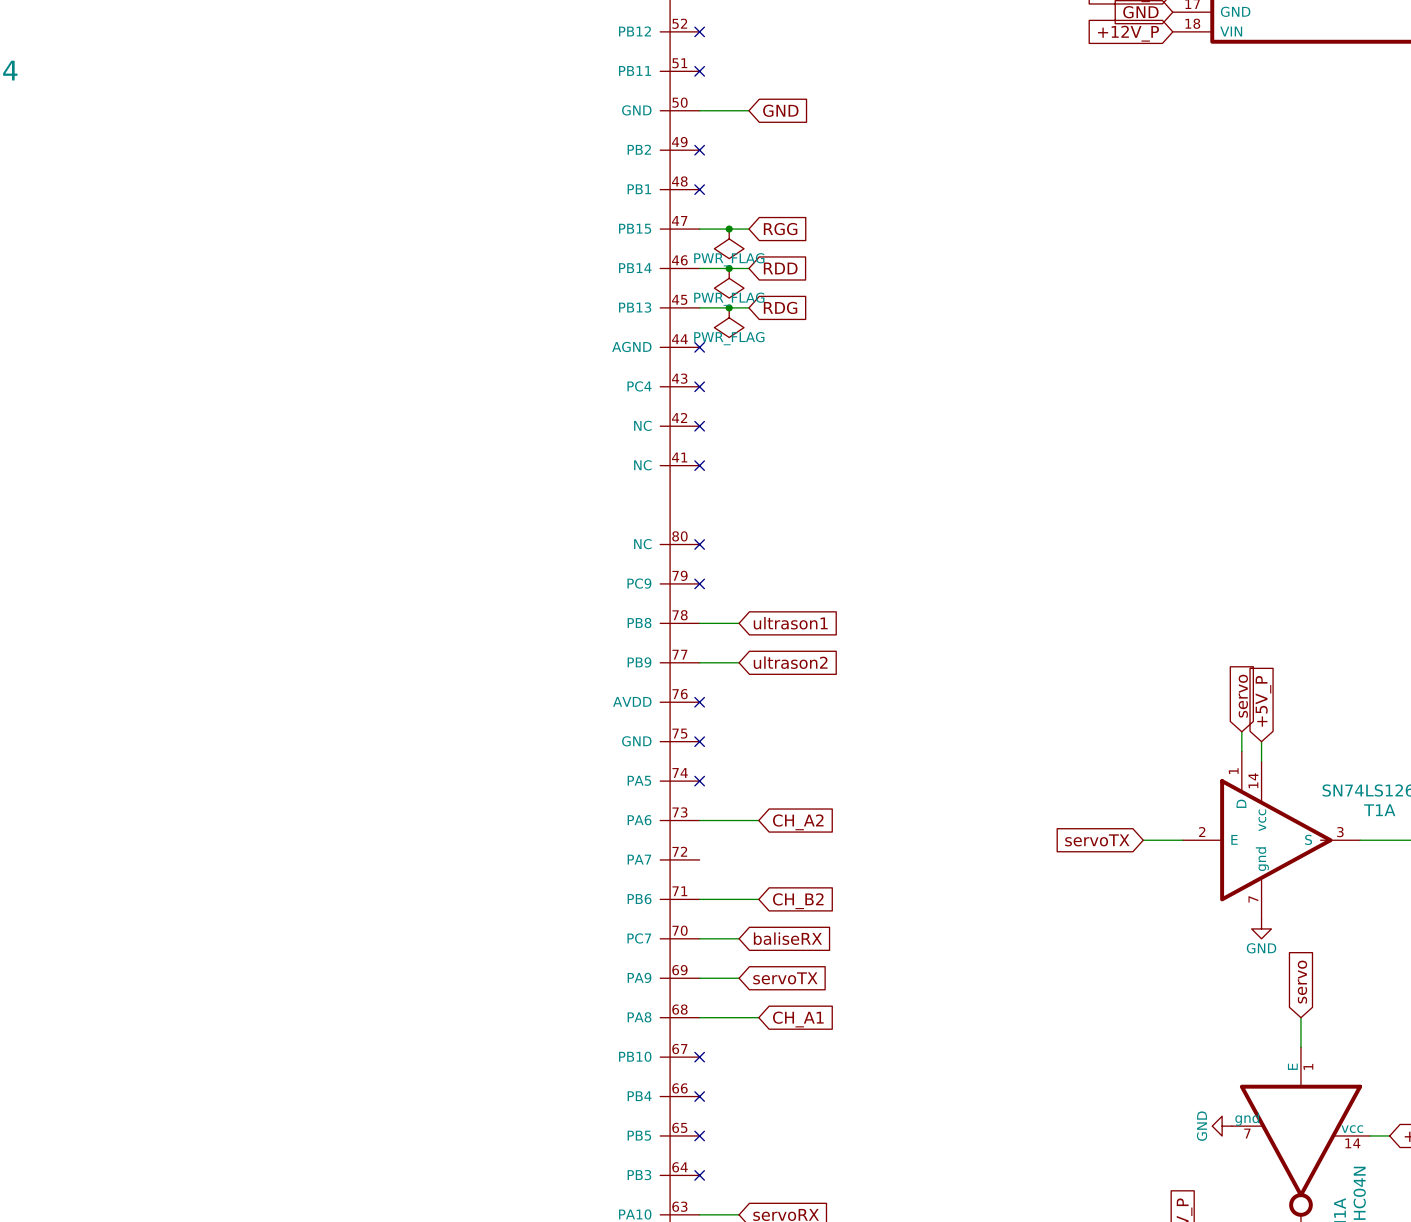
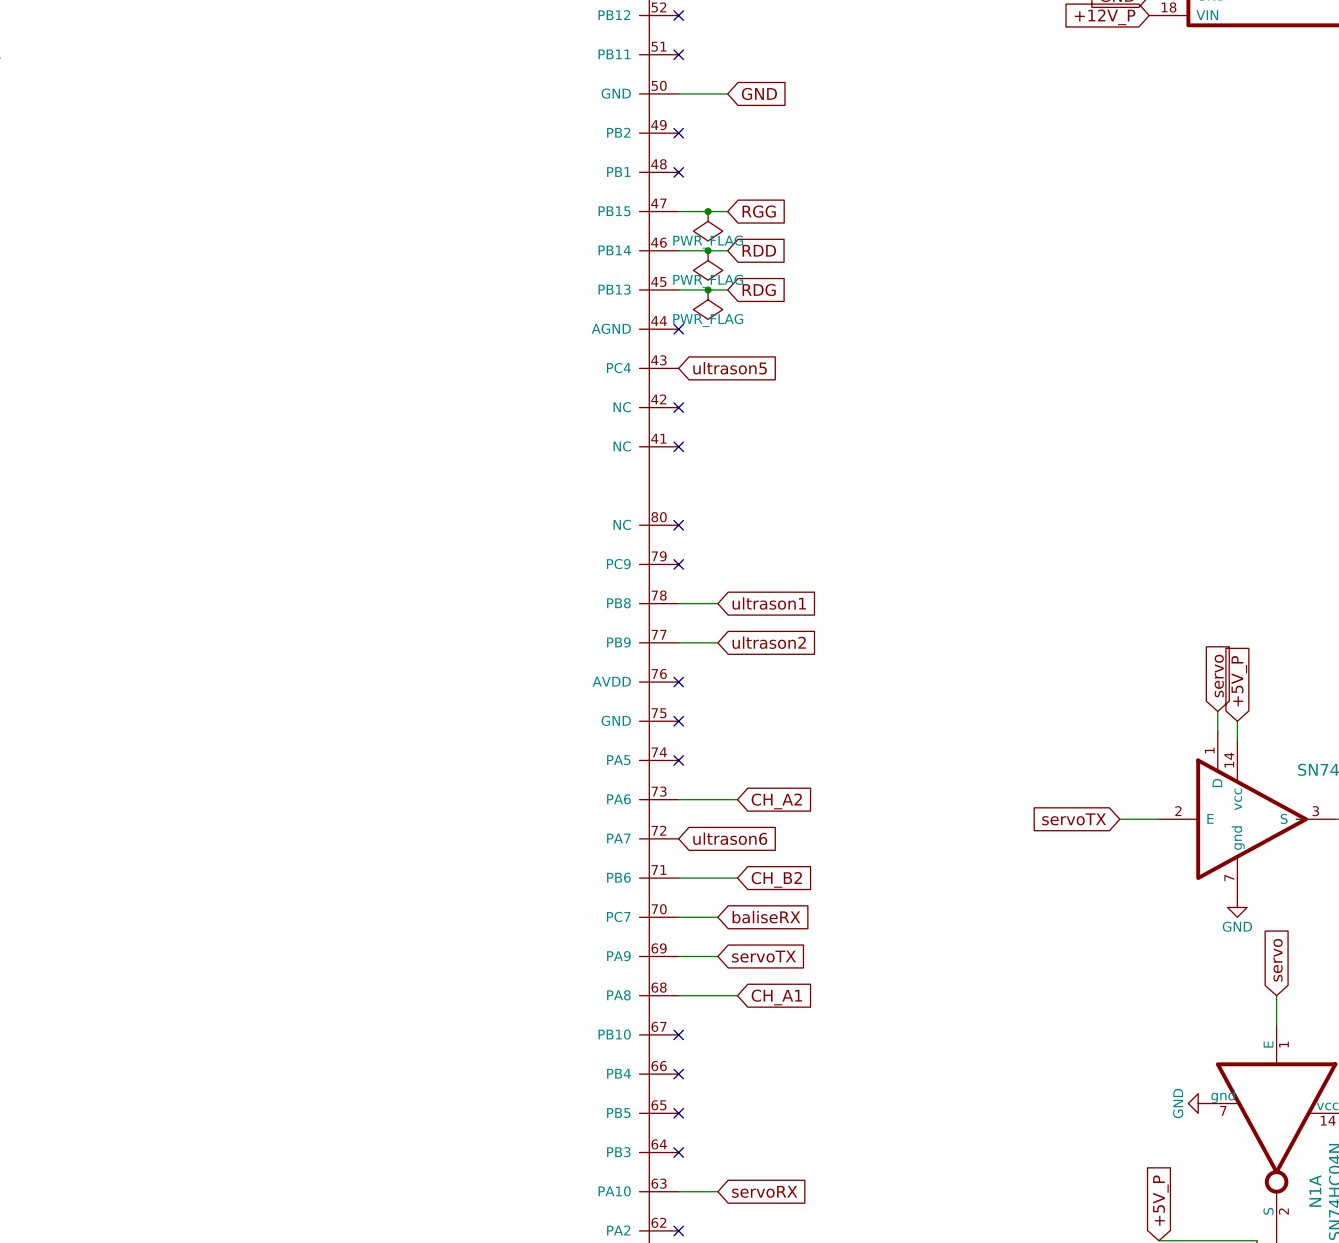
no-connect mark: (699, 386) -> none
global label: none -> ultrason5 (730, 368)
global label: none -> ultrason6 (730, 838)

